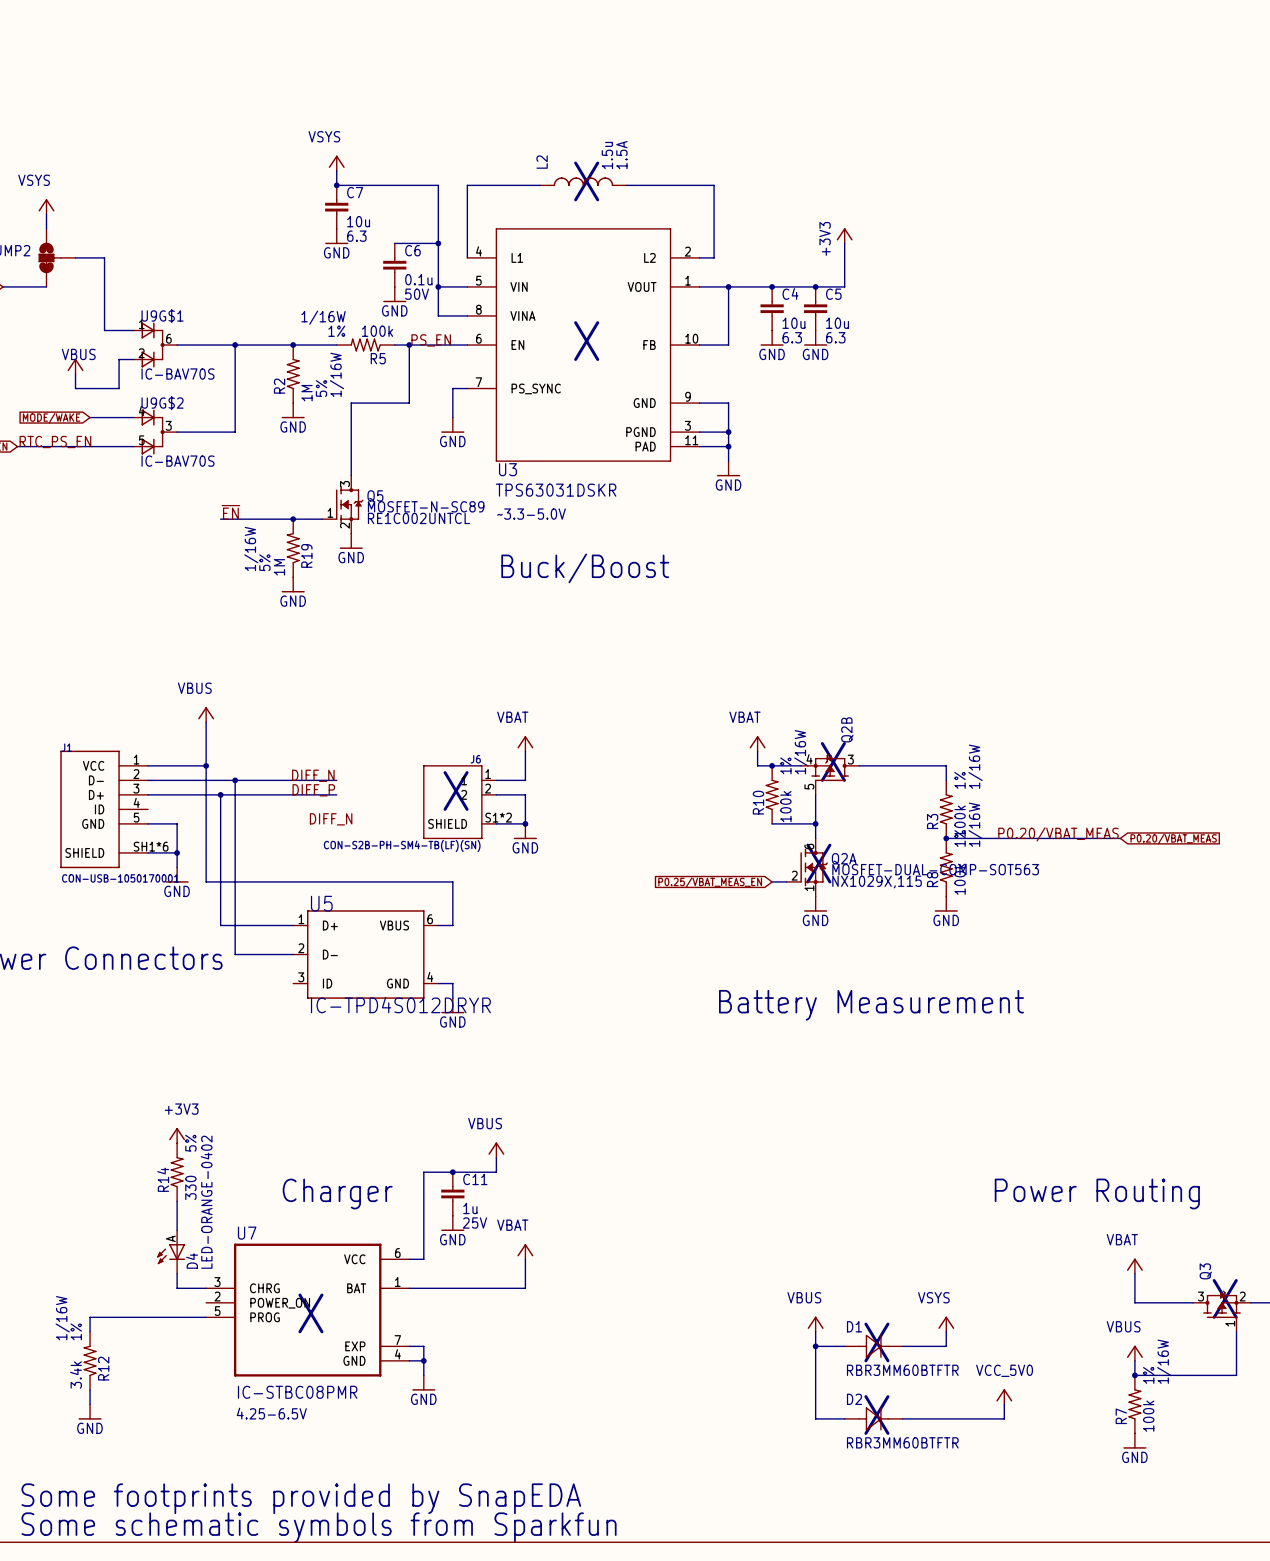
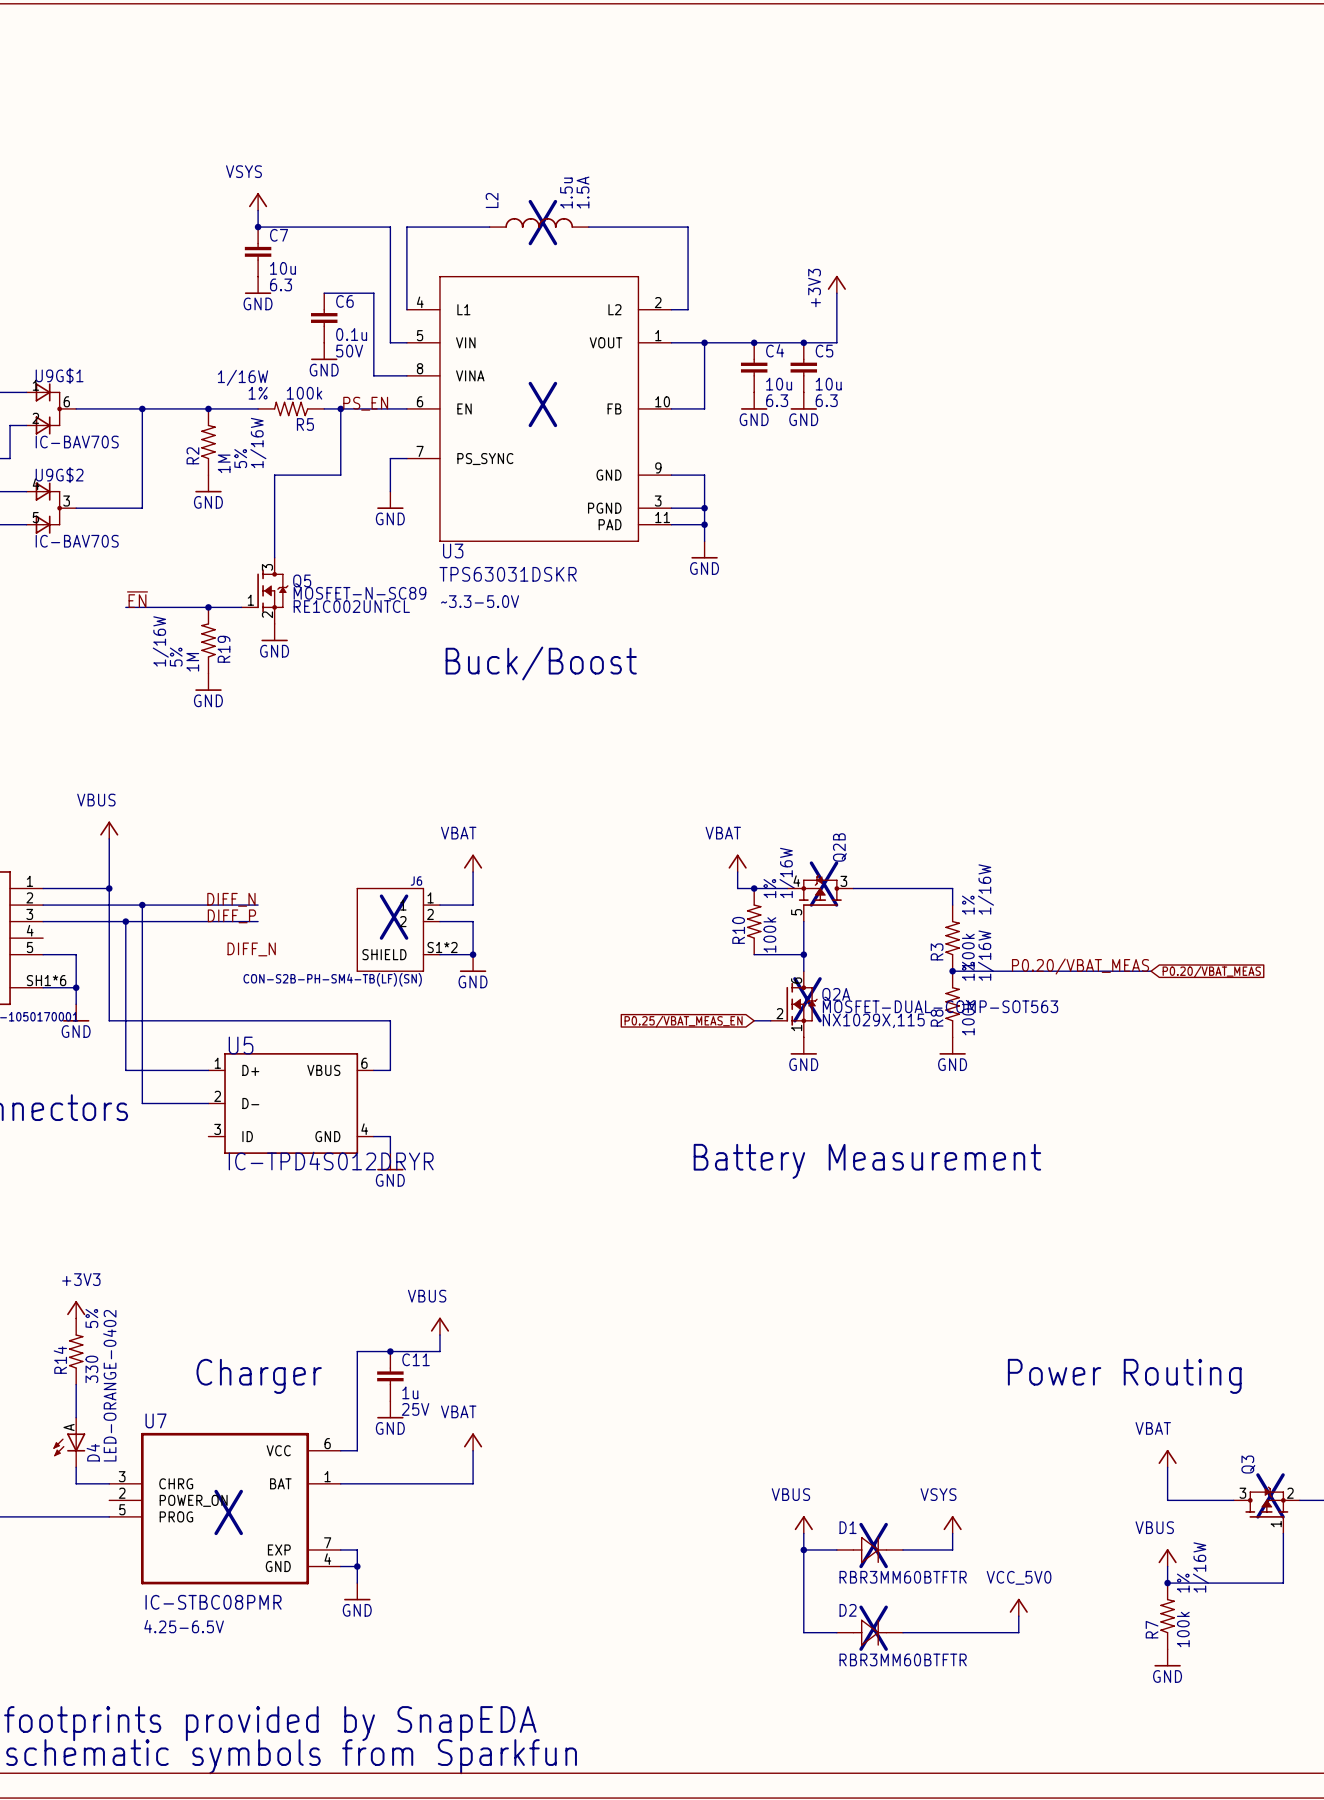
wire: (438, 185) (438, 243) -> (373, 227) (390, 227) (390, 342)
junction: (438, 243) -> none
wire: (438, 286) (452, 286) -> none
junction: (438, 286) -> none

